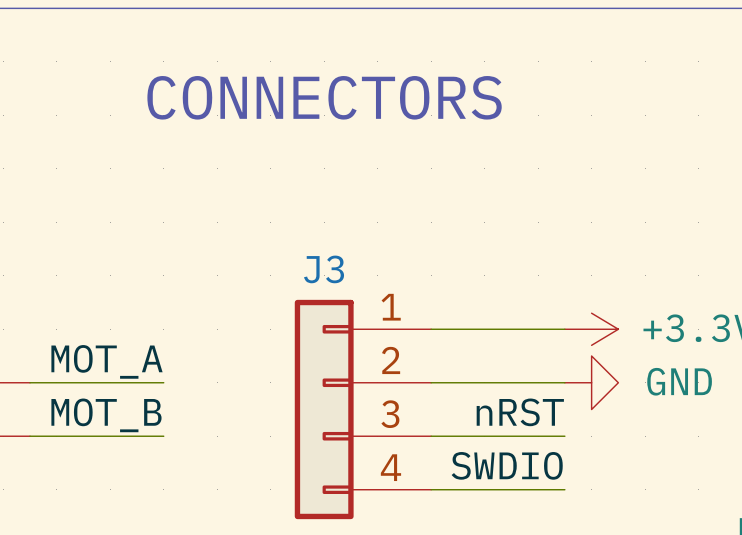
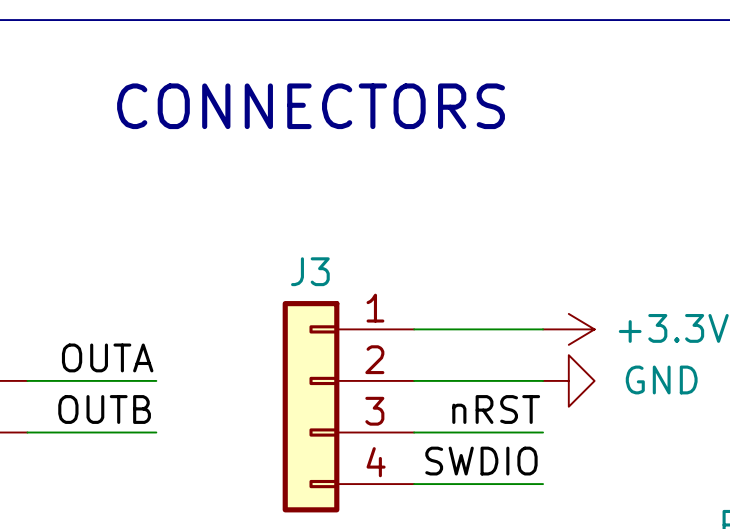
label: MOT_A (106, 361) -> OUTA (107, 357)
label: MOT_B (106, 415) -> OUTB (104, 409)

